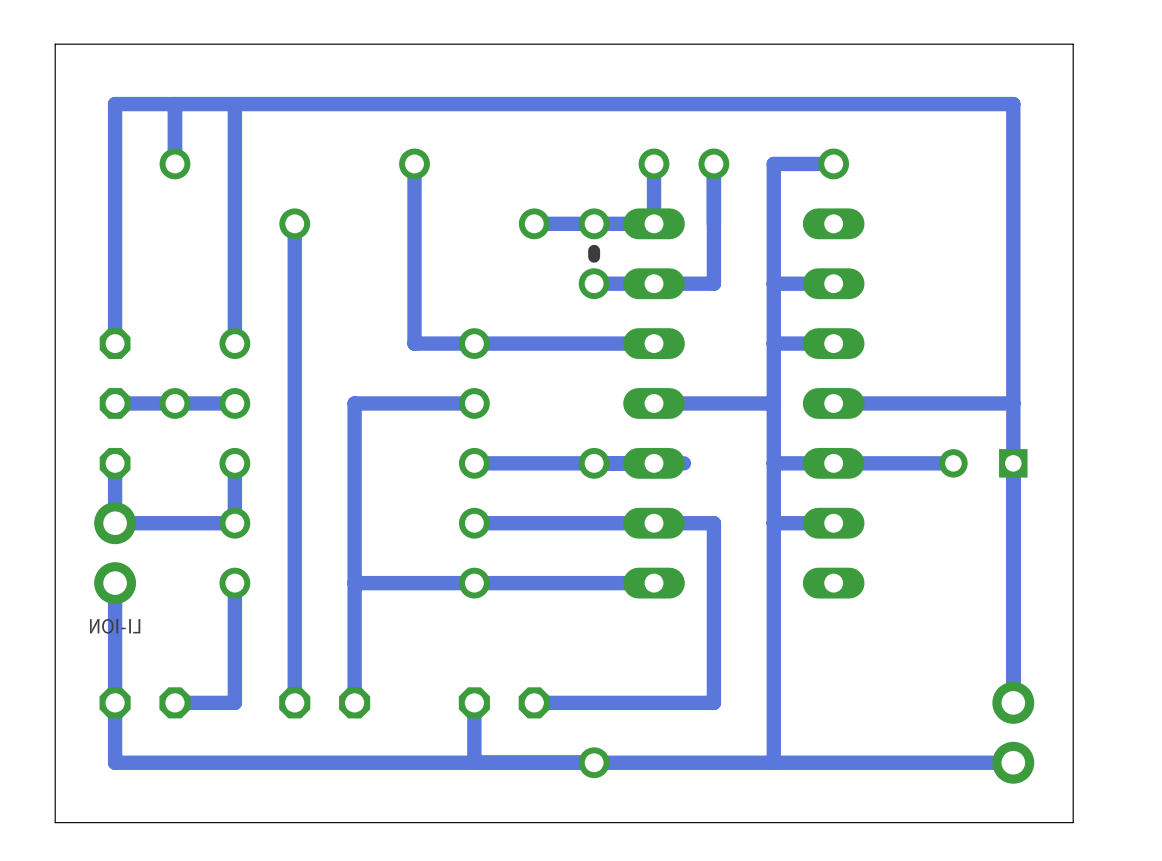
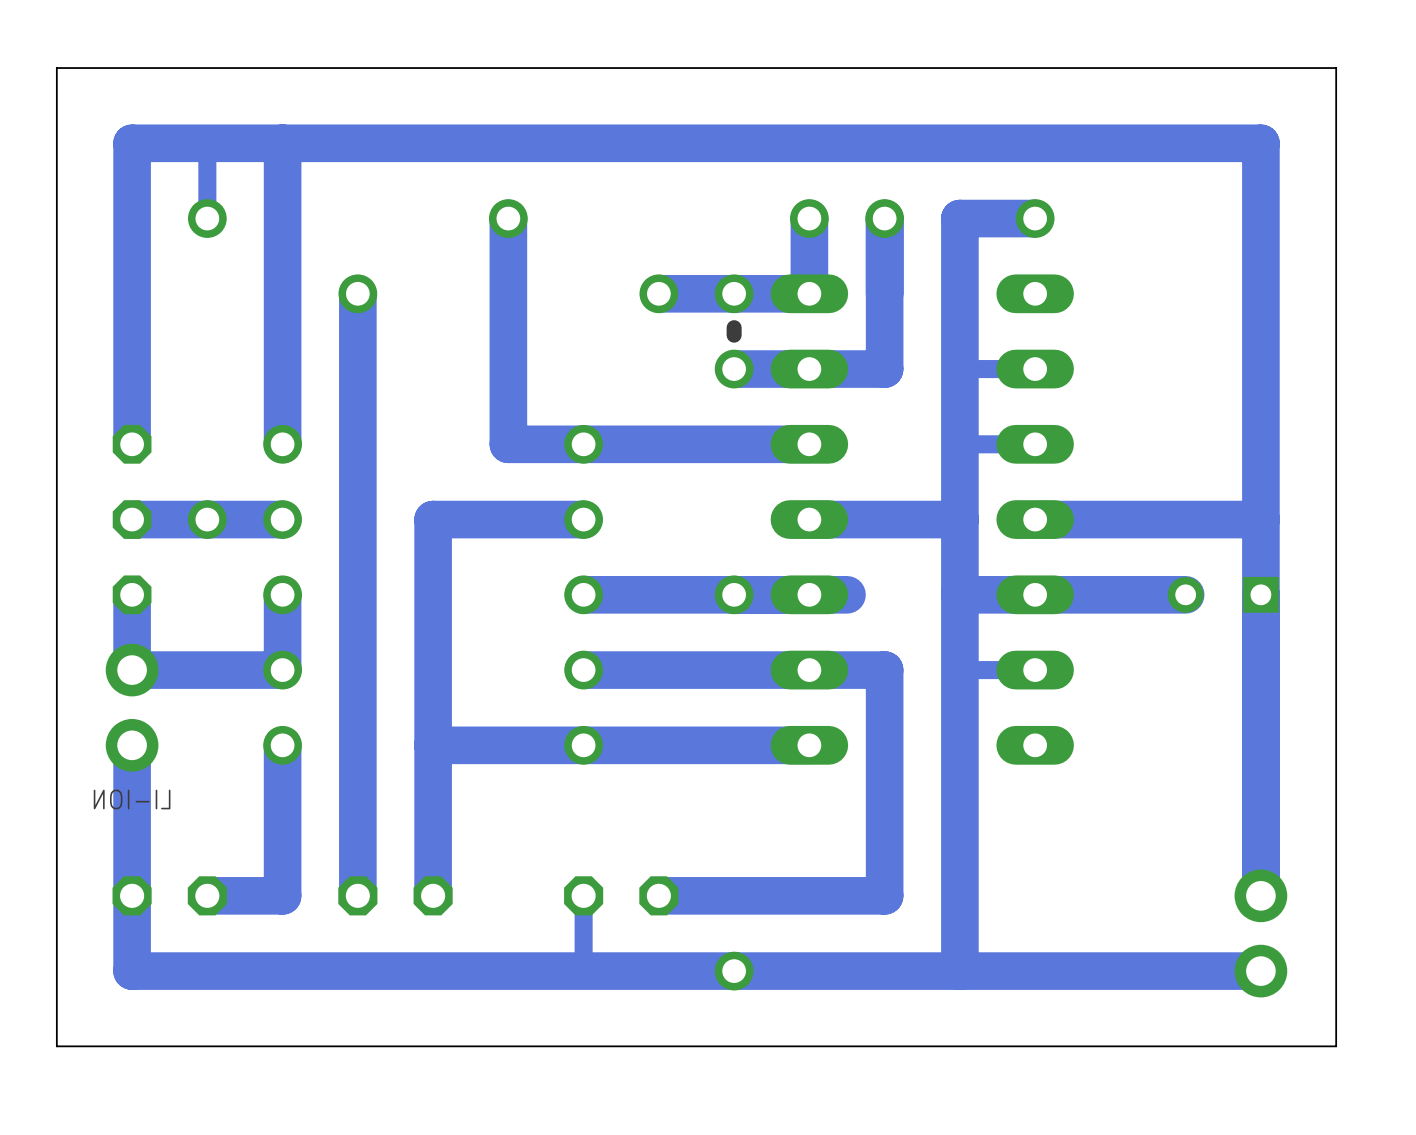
bottom track width: thin (234, 104) (234, 343) -> thick (282, 143) (282, 444)
bottom track width: thin (414, 163) (414, 343) (654, 343) -> thick (508, 218) (508, 444) (809, 444)
bottom track width: thin (654, 163) (654, 223) (534, 223) -> thick (809, 218) (809, 293) (658, 293)
bottom track width: thin (713, 163) (713, 283) (594, 283) -> thick (884, 218) (884, 369) (734, 369)
bottom track width: thin (833, 163) (773, 163) (773, 762) -> thick (1035, 218) (959, 218) (959, 971)
bottom track width: thin (294, 223) (294, 702) -> thick (357, 293) (357, 895)
bottom track width: thin (115, 343) (115, 104) (1013, 104) (1013, 702) -> thick (132, 444) (132, 143) (1260, 143) (1260, 895)
bottom track width: thin (234, 403) (115, 403) -> thick (282, 519) (132, 519)
bottom track width: thin (474, 403) (354, 403) (354, 702) -> thick (583, 519) (433, 519) (433, 895)
bottom track width: thin (773, 403) (654, 403) -> thick (959, 519) (809, 519)
bottom track width: thin (1013, 403) (833, 403) -> thick (1260, 519) (1035, 519)
bottom track width: thin (234, 463) (234, 523) (115, 523) (115, 463) -> thick (282, 594) (282, 670) (132, 670) (132, 594)
bottom track width: thin (683, 463) (474, 463) -> thick (847, 594) (583, 594)
bottom track width: thin (953, 463) (773, 463) -> thick (1185, 594) (959, 594)
bottom track width: thin (474, 523) (713, 523) (713, 702) (534, 702) -> thick (583, 670) (884, 670) (884, 895) (658, 895)
bottom track width: thin (115, 583) (115, 762) (1013, 762) -> thick (132, 745) (132, 971) (1260, 971)
bottom track width: thin (234, 583) (234, 702) (174, 702) -> thick (282, 745) (282, 895) (207, 895)
bottom track width: thin (654, 583) (354, 583) -> thick (809, 745) (433, 745)

